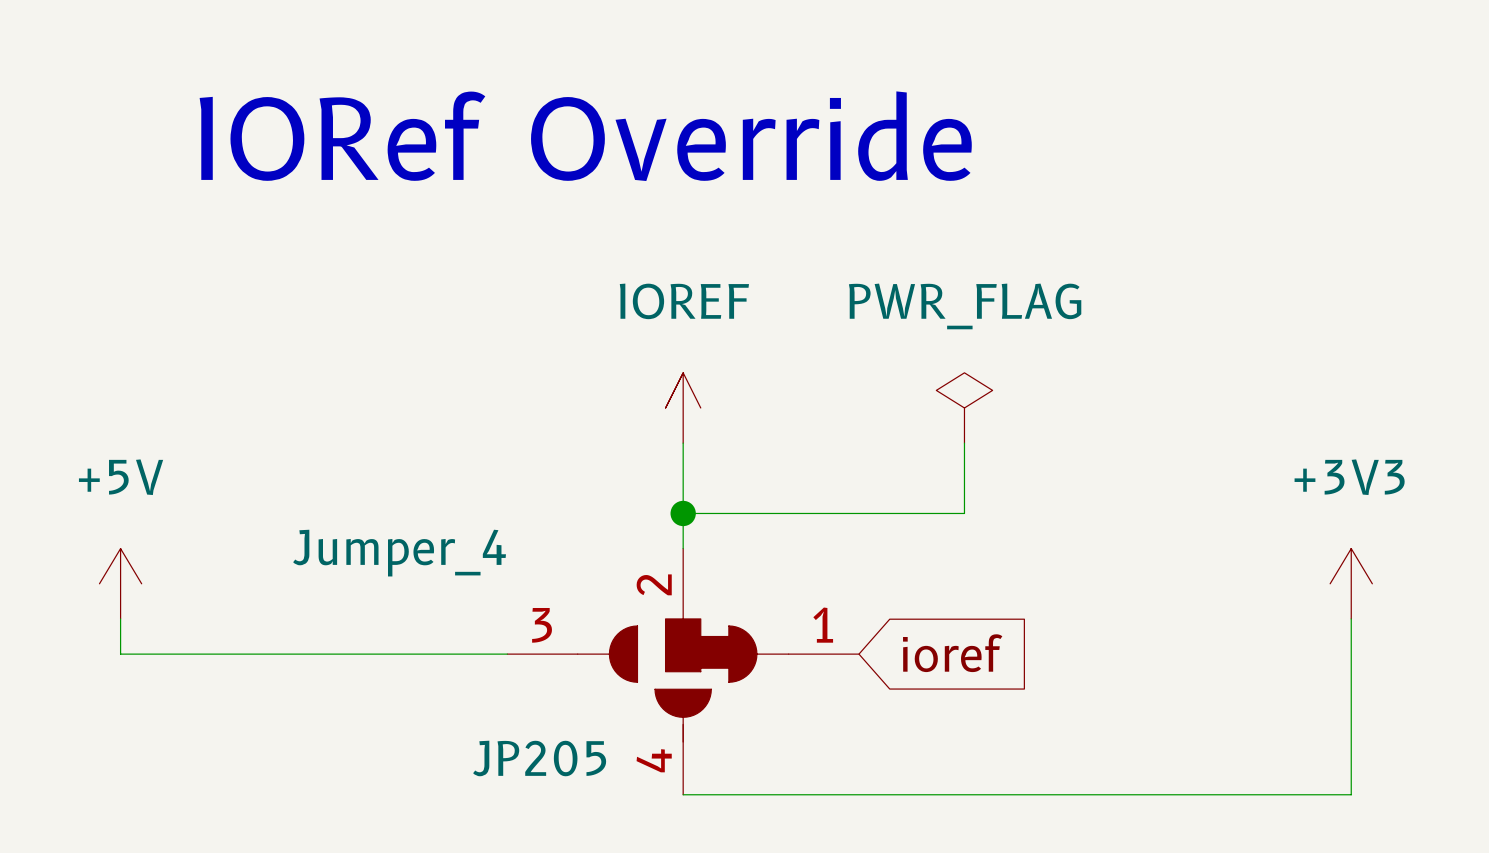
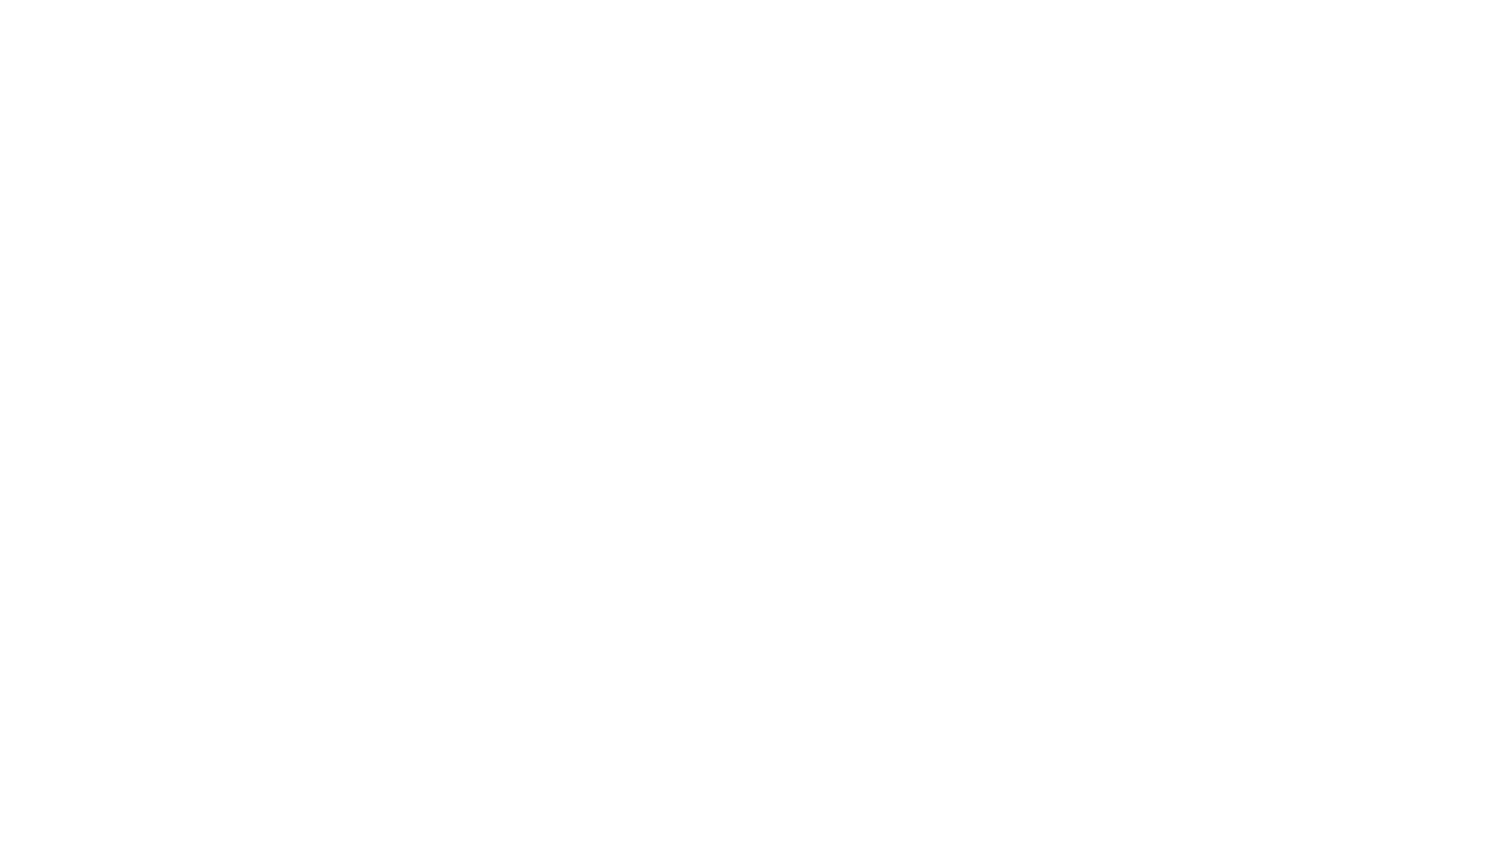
text: IORef Override (585, 136) -> none
power symbol: IOREF (683, 407) -> none
power symbol: PWR_FLAG (964, 407) -> none
wire: (683, 443) (683, 548) -> none
wire: (964, 443) (964, 513) (683, 513) -> none
junction: (683, 513) -> none
power symbol: +5V (120, 583) -> none
power symbol: +3V3 (1351, 583) -> none
wire: (120, 618) (120, 654) (507, 654) -> none
wire: (1351, 618) (1351, 794) (683, 794) -> none
global label: ioref (952, 653) -> none
JP205: Jumper_4 (683, 671) -> none

